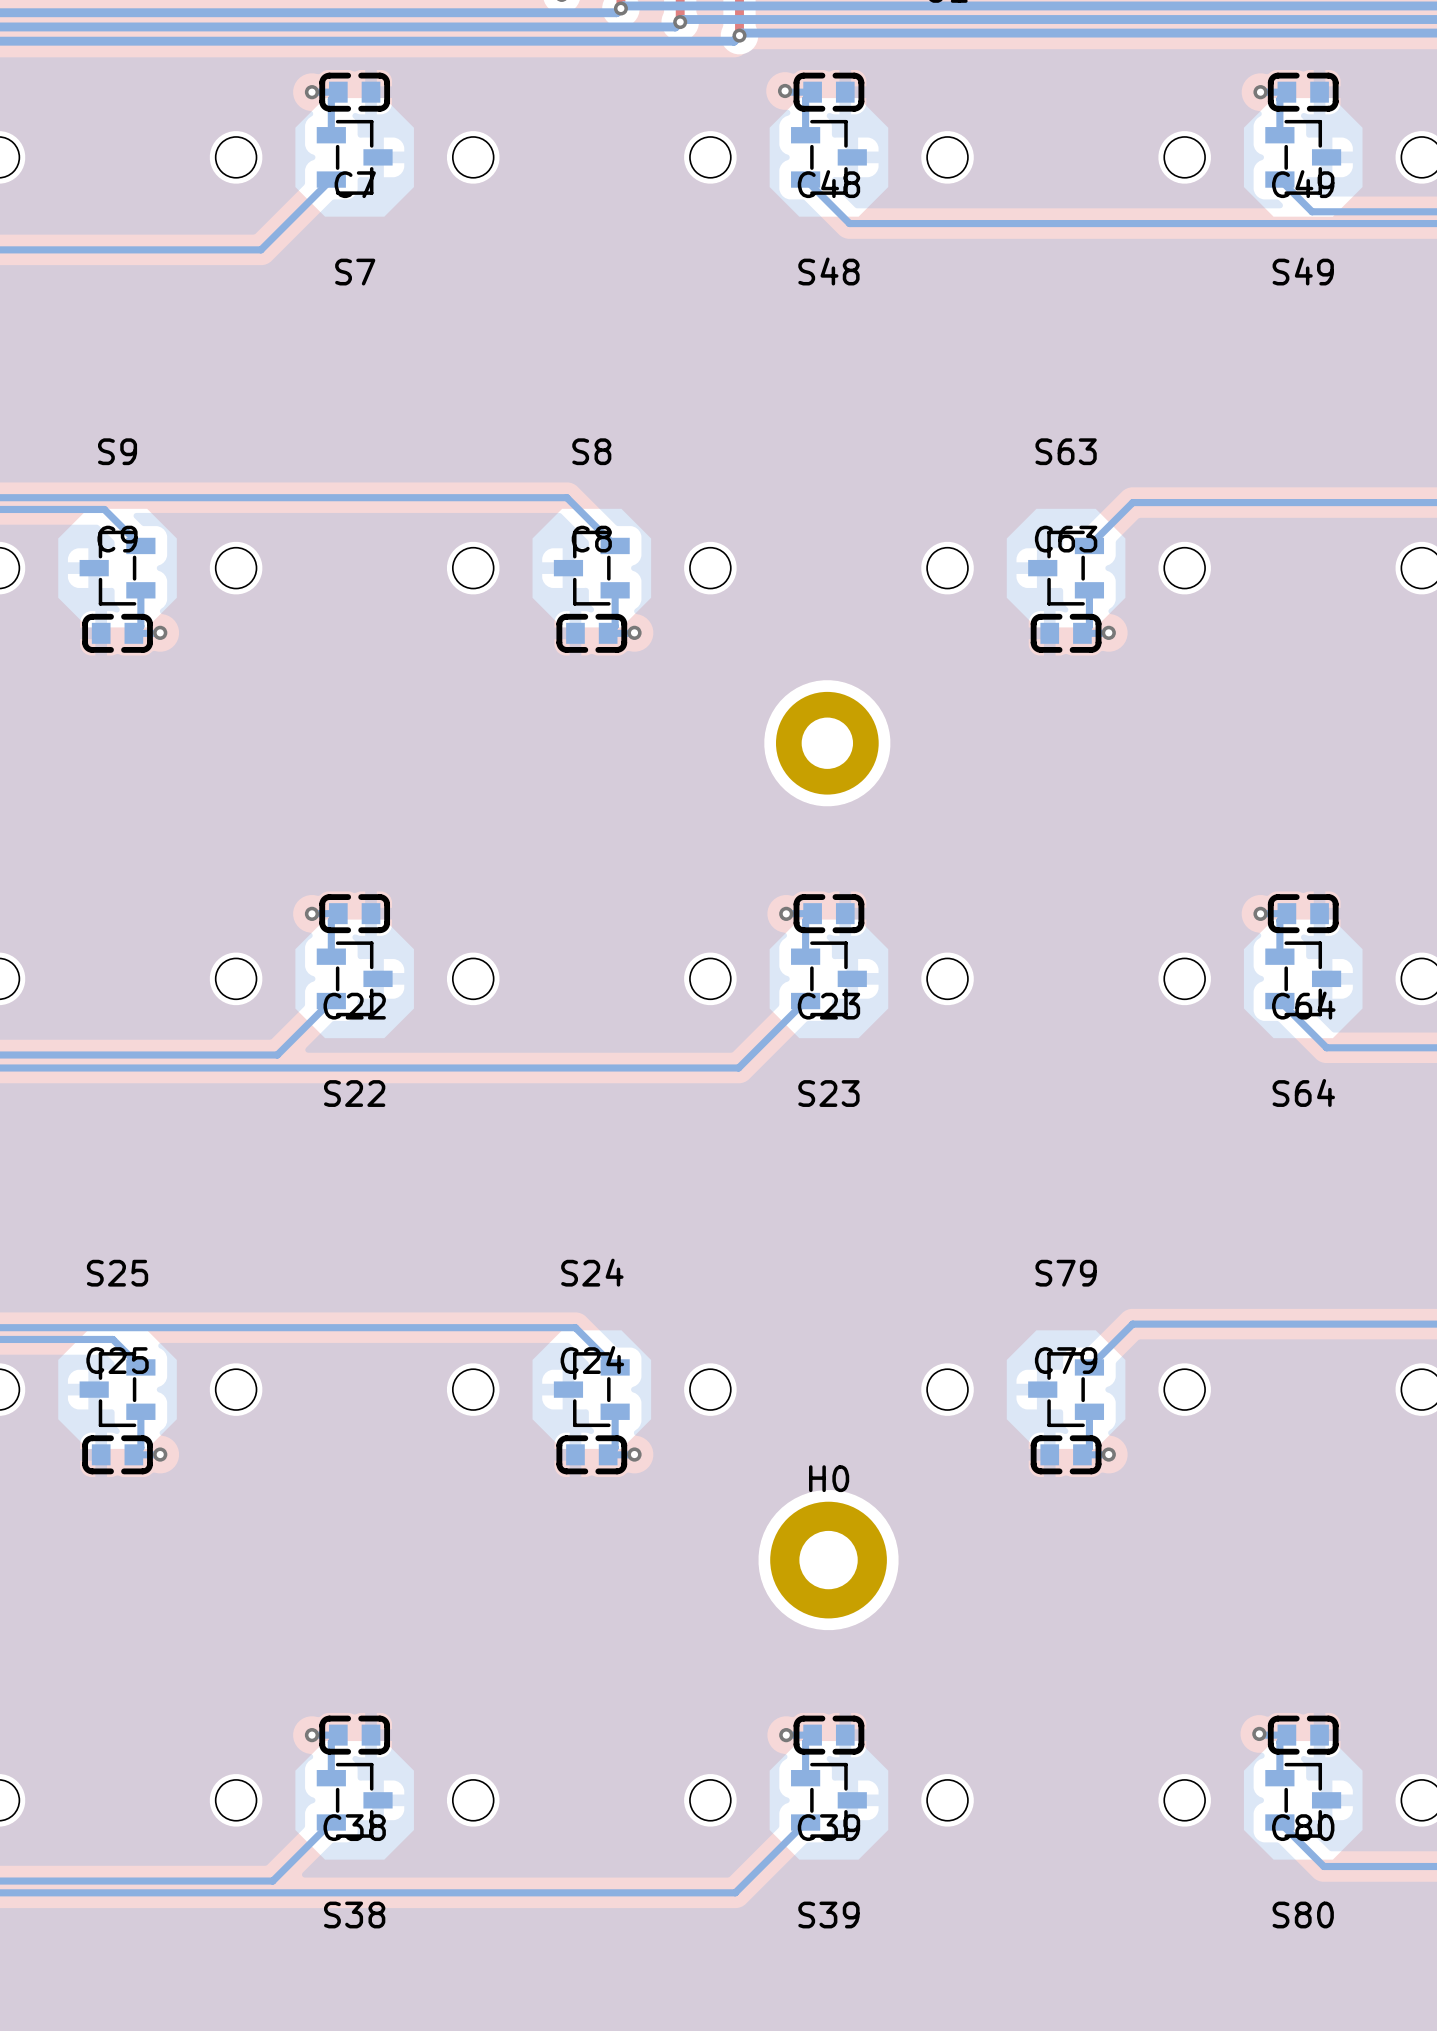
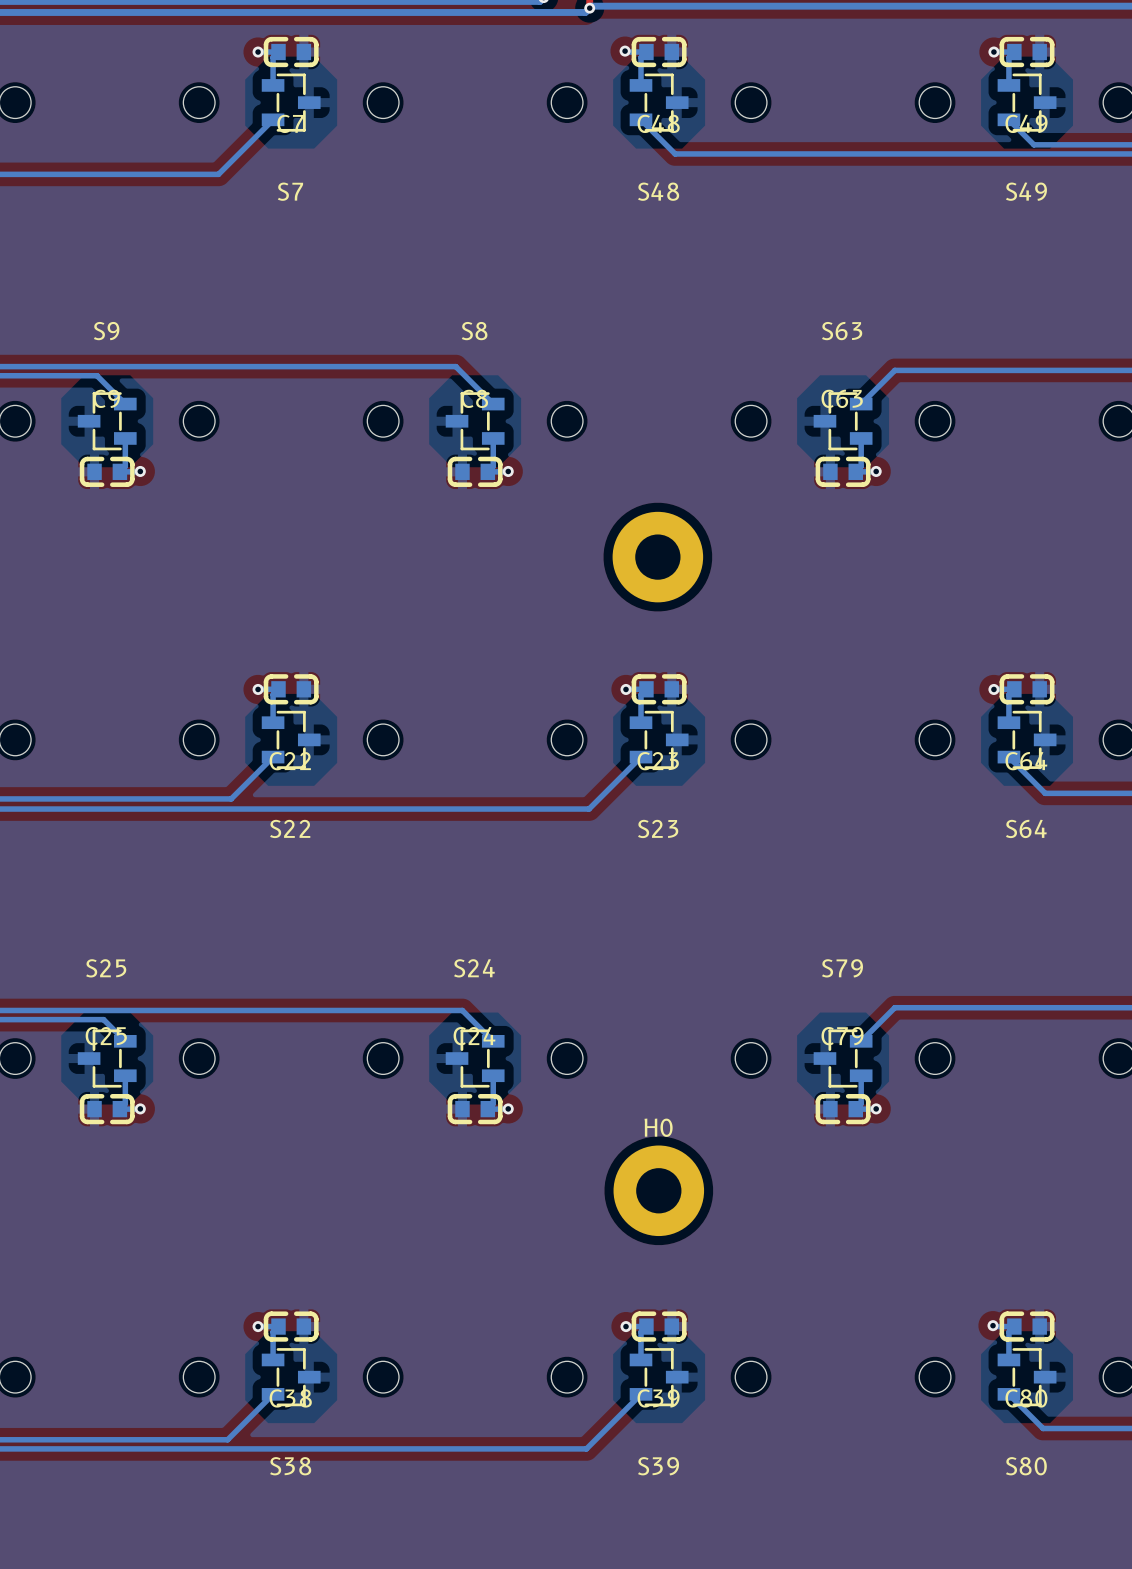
part footprint: [775, 691, 879, 795] -> [612, 511, 704, 603]

